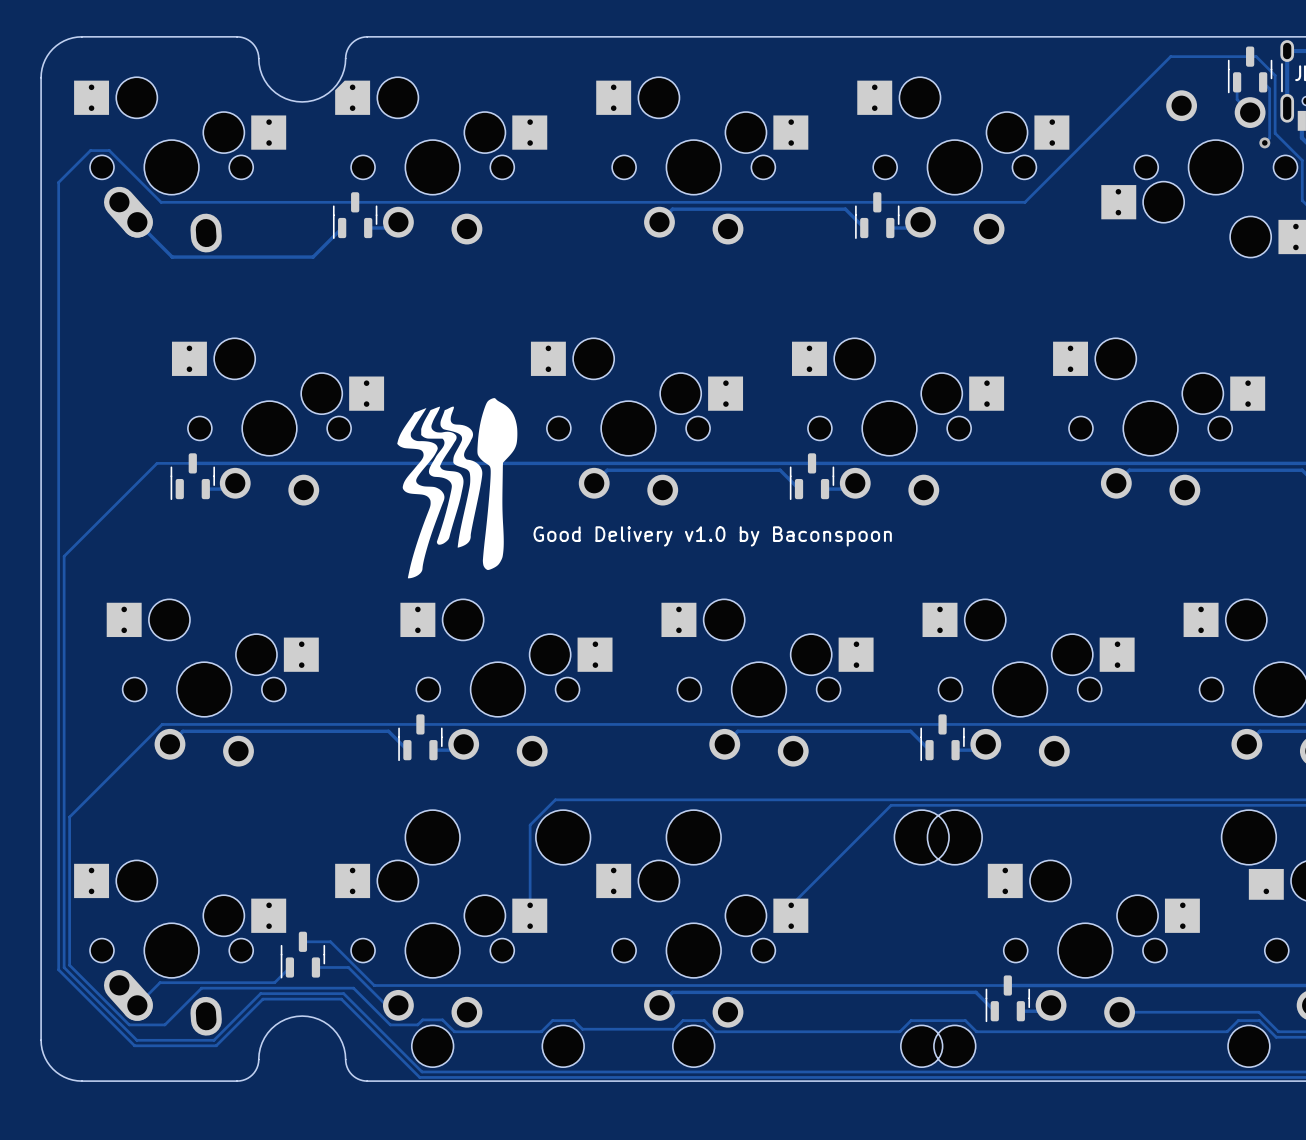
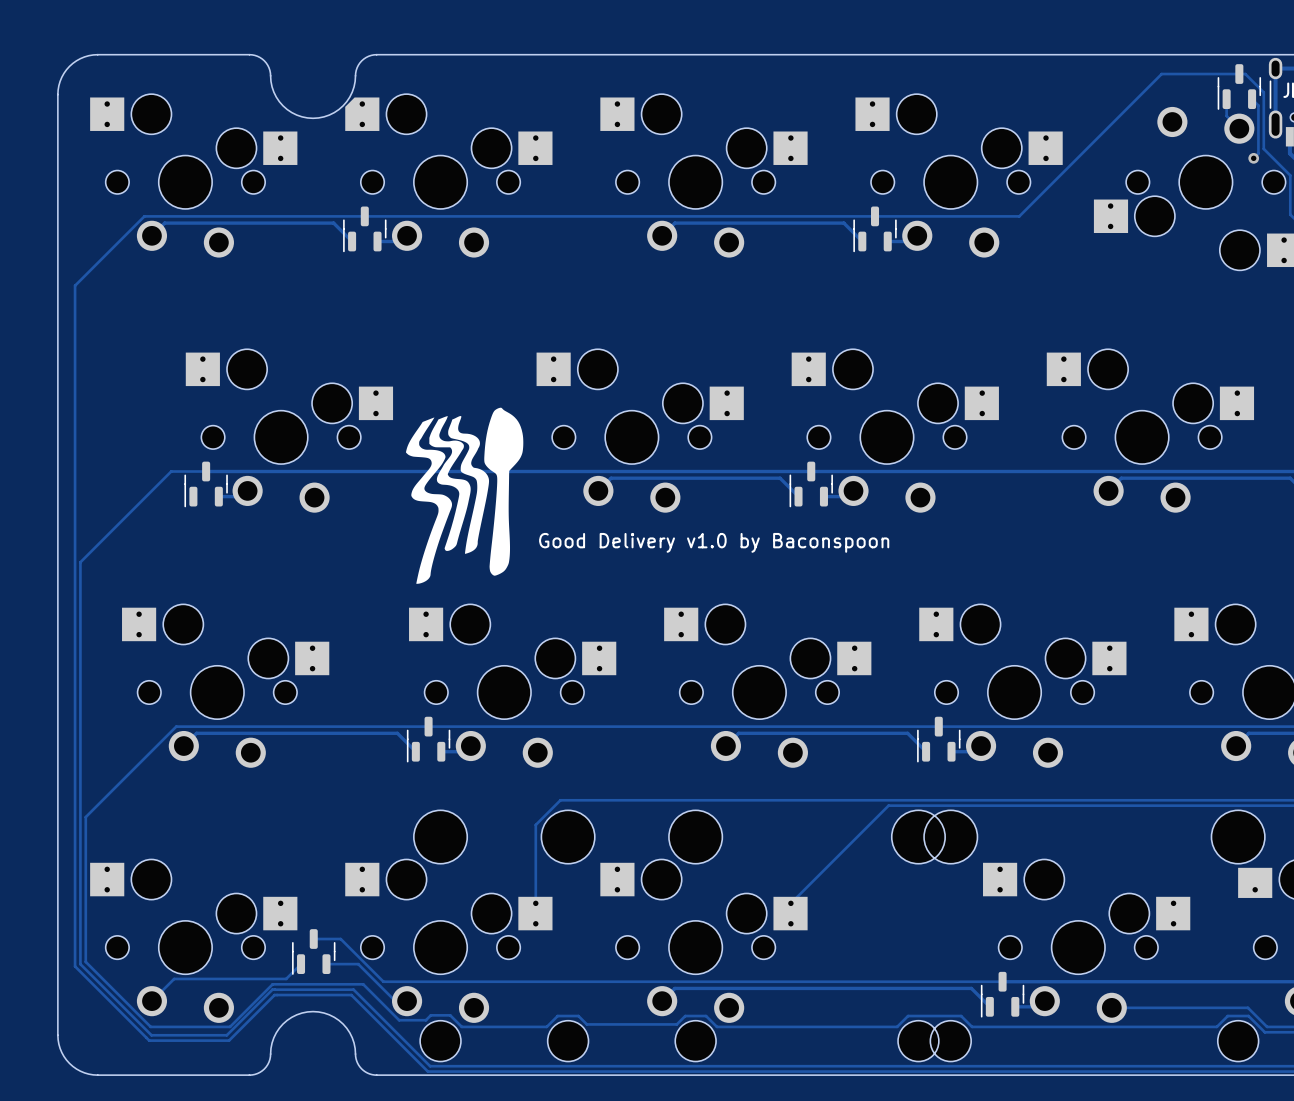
part footprint: [74, 77, 287, 253] -> [90, 94, 298, 258]
track: (161, 202) (109, 150) (90, 150) (58, 182) (58, 273) -> (175, 216) (144, 216) (75, 285)
track: (137, 222) (172, 257) (313, 257) (342, 228) -> (151, 235) (164, 223) (333, 223) (352, 241)
part footprint: [74, 860, 287, 1036] -> [90, 859, 298, 1023]
track: (260, 988) (201, 988) (164, 1024) (129, 1024) -> (272, 984) (230, 1026) (150, 1026) (144, 1020)

